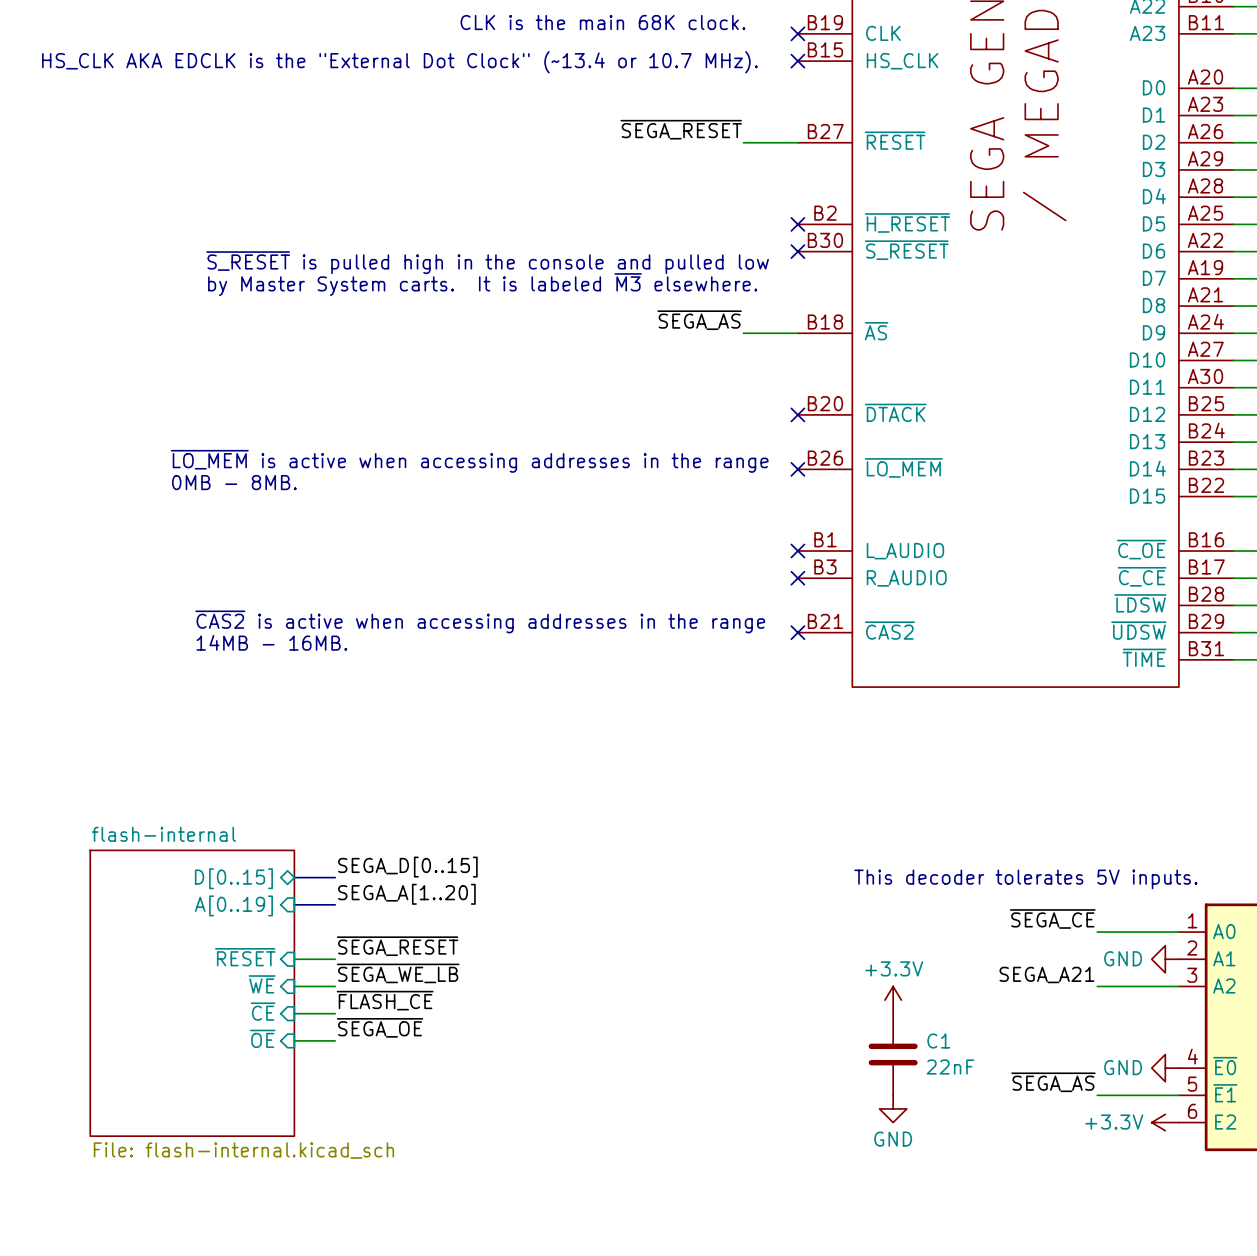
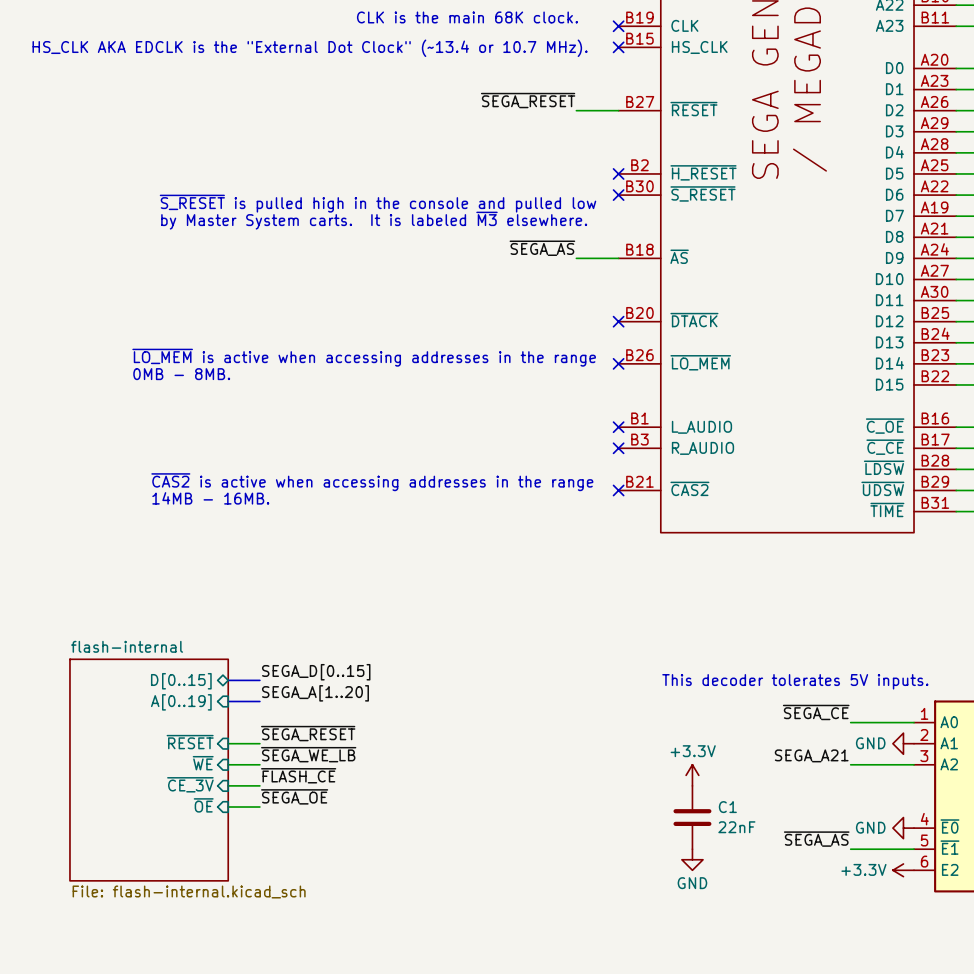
sheet pin: ~{CE} (263, 1011) -> ~{CE_3V} (190, 784)

